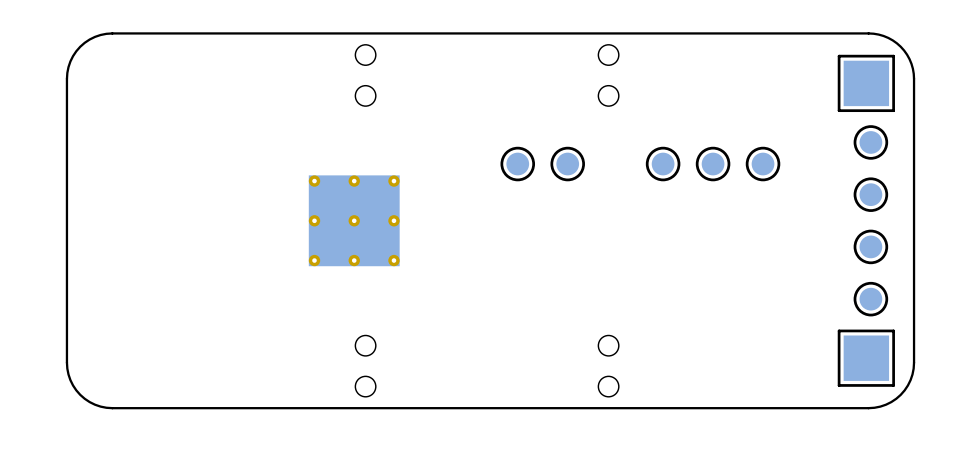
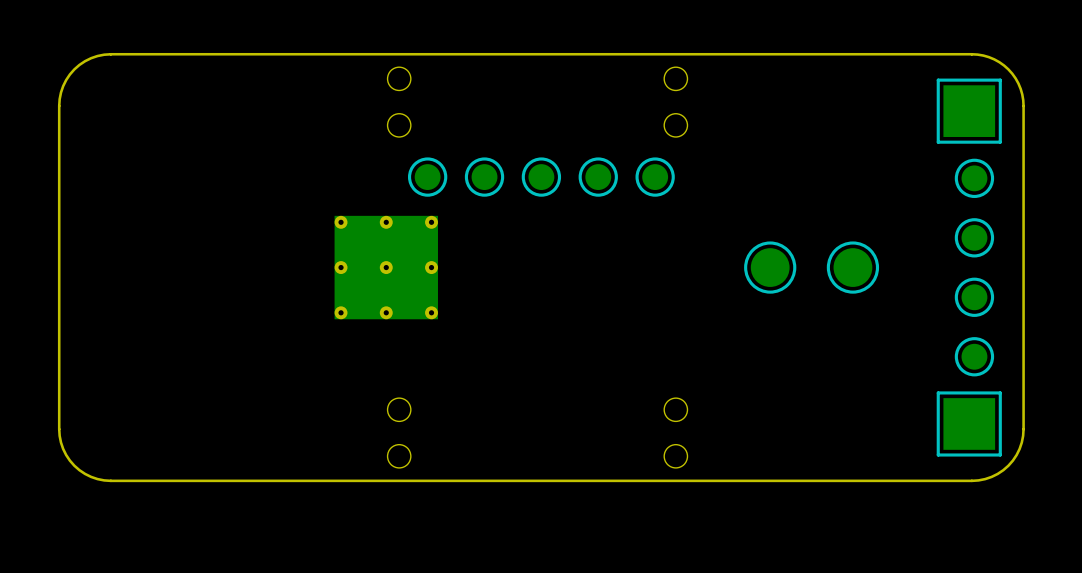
part: none -> (427, 177)
part: none -> (484, 177)
part: none -> (541, 177)
part: none -> (598, 177)
part: none -> (655, 177)
part: (517, 164) -> none
part: (567, 164) -> none
part: (663, 164) -> none
part: (713, 164) -> none
part: (763, 164) -> none
part: none -> (770, 267)
part: none -> (852, 267)

